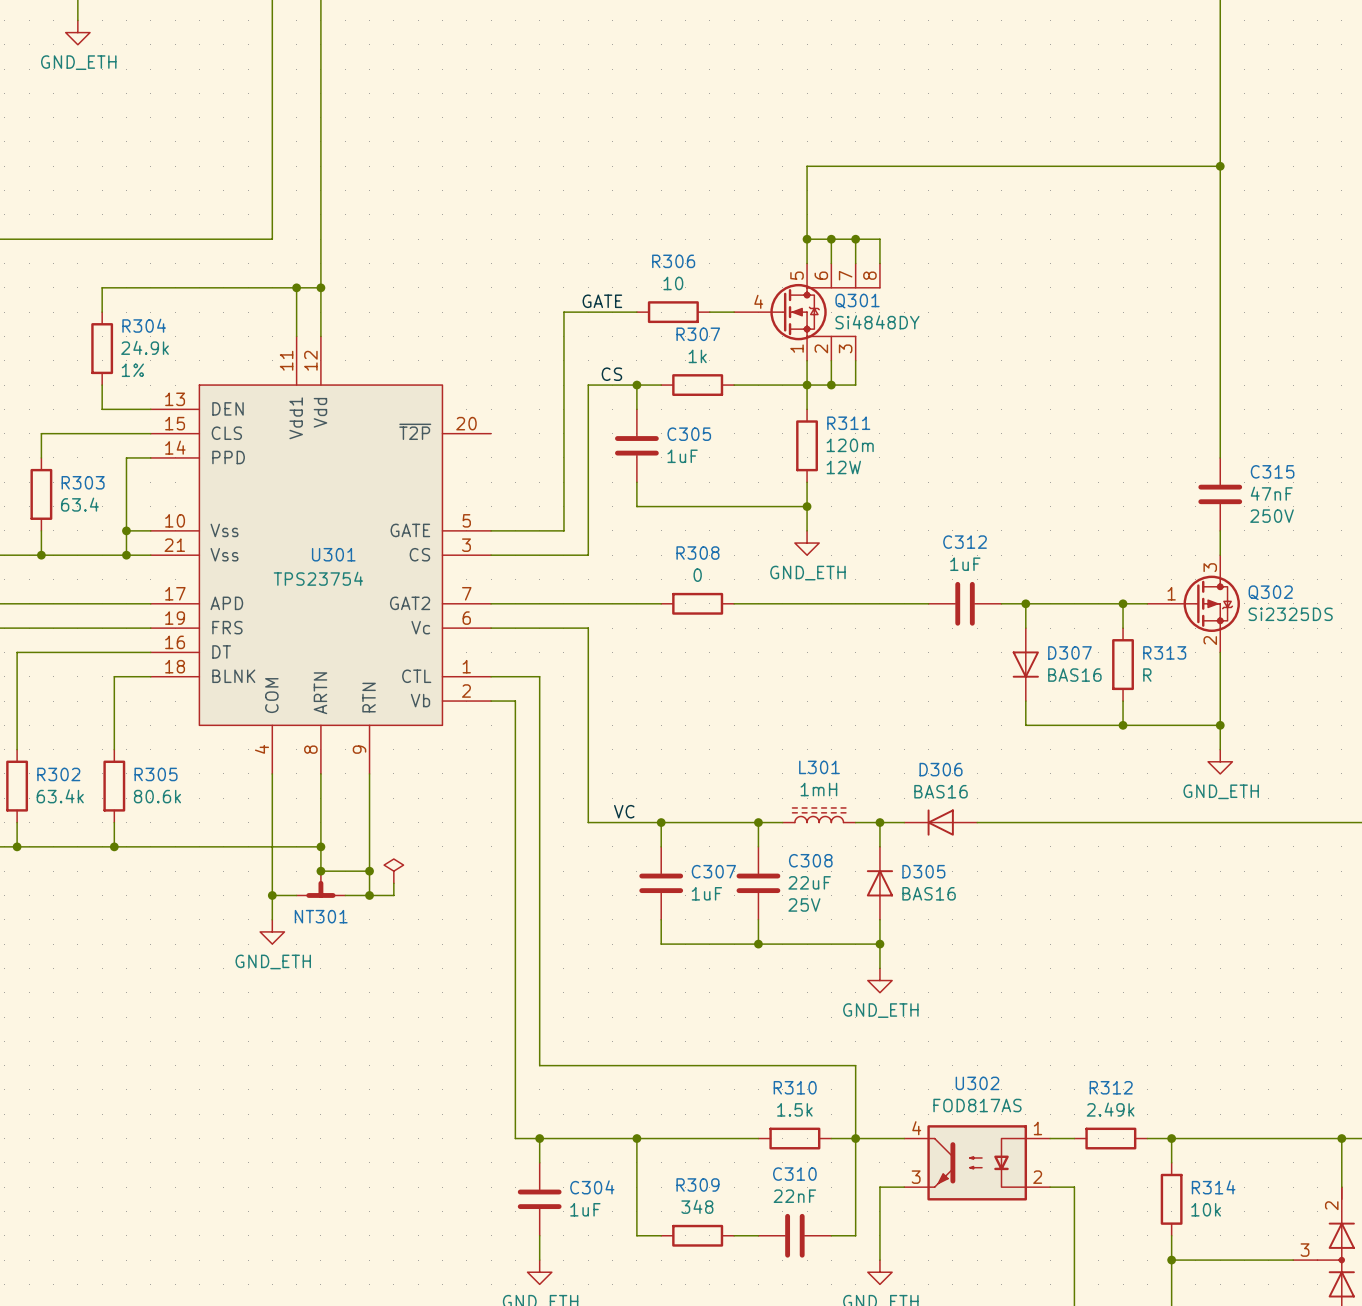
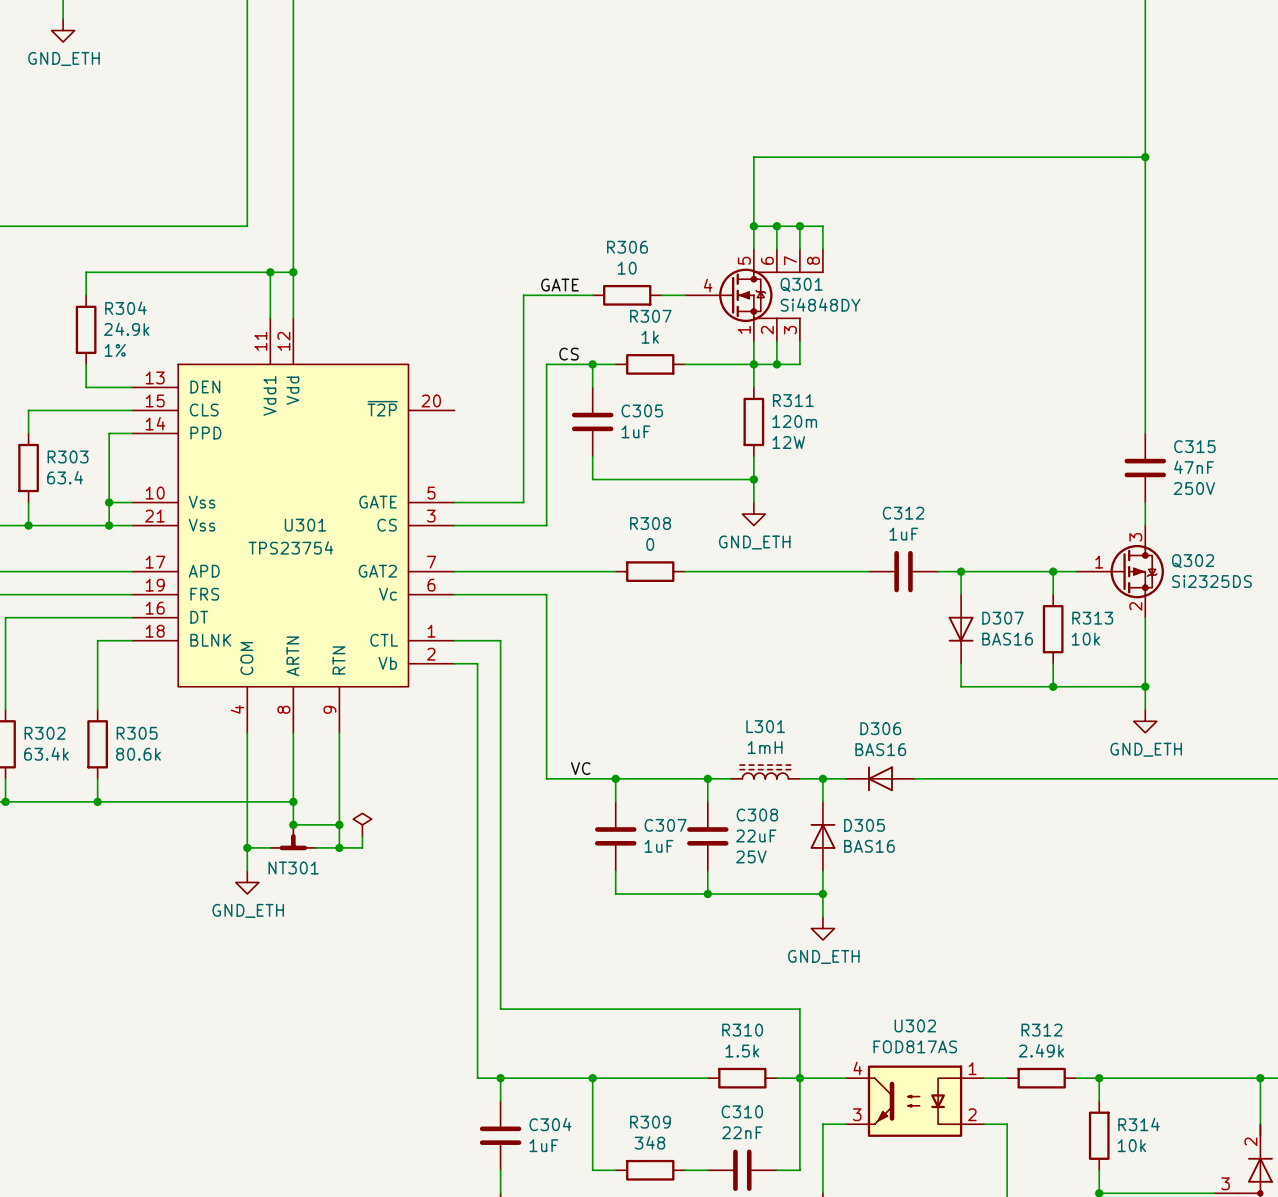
R313 value: R (1147, 675) -> 10k (1085, 639)

